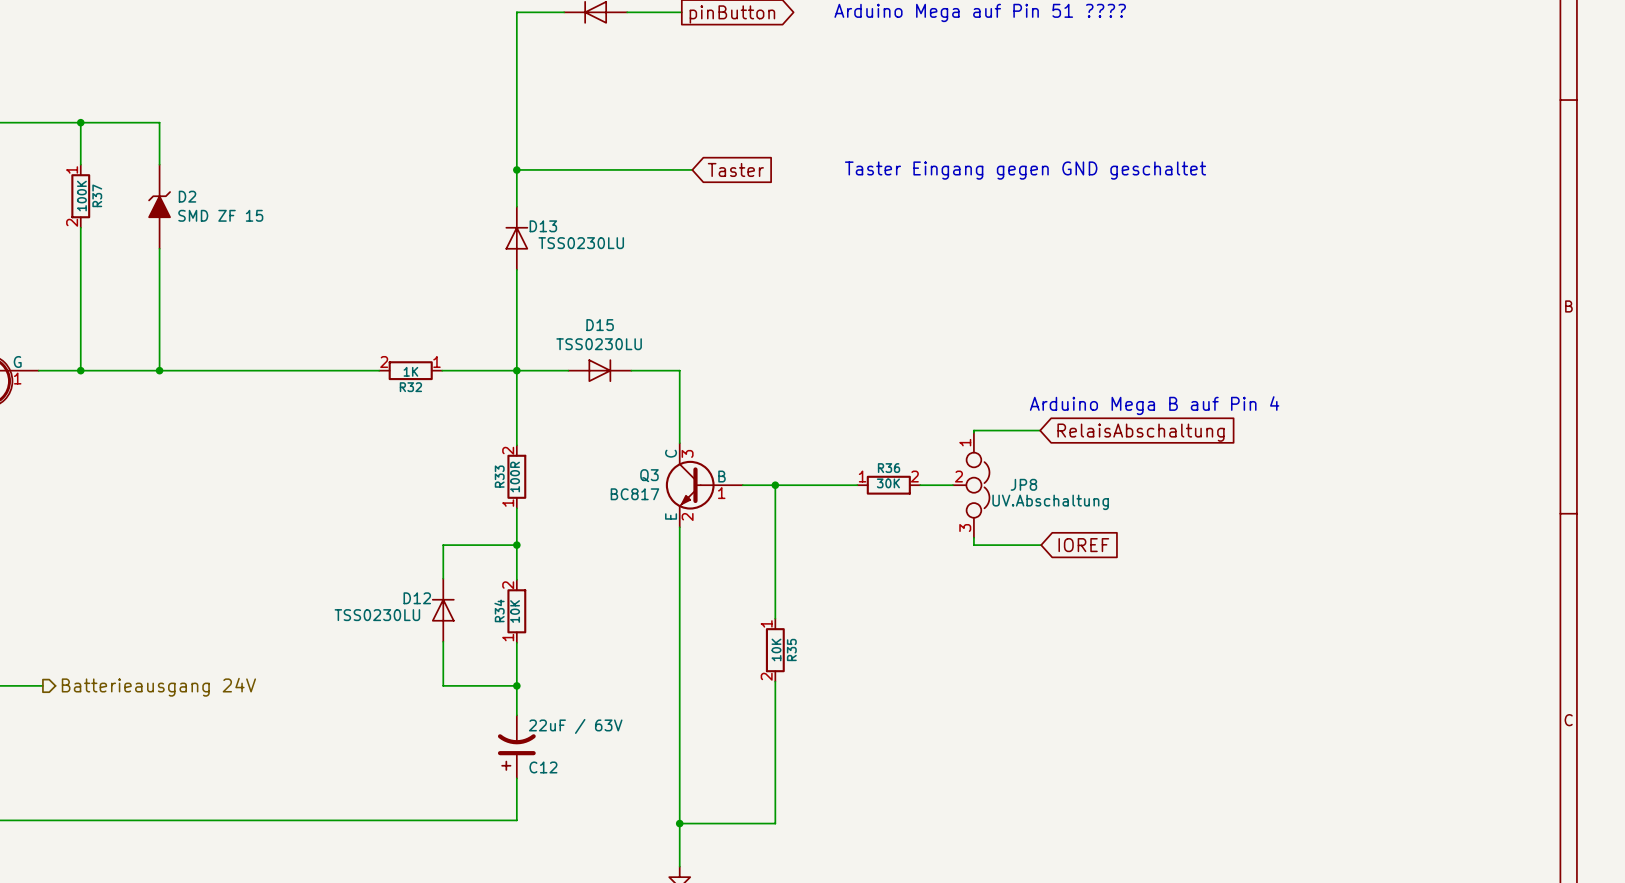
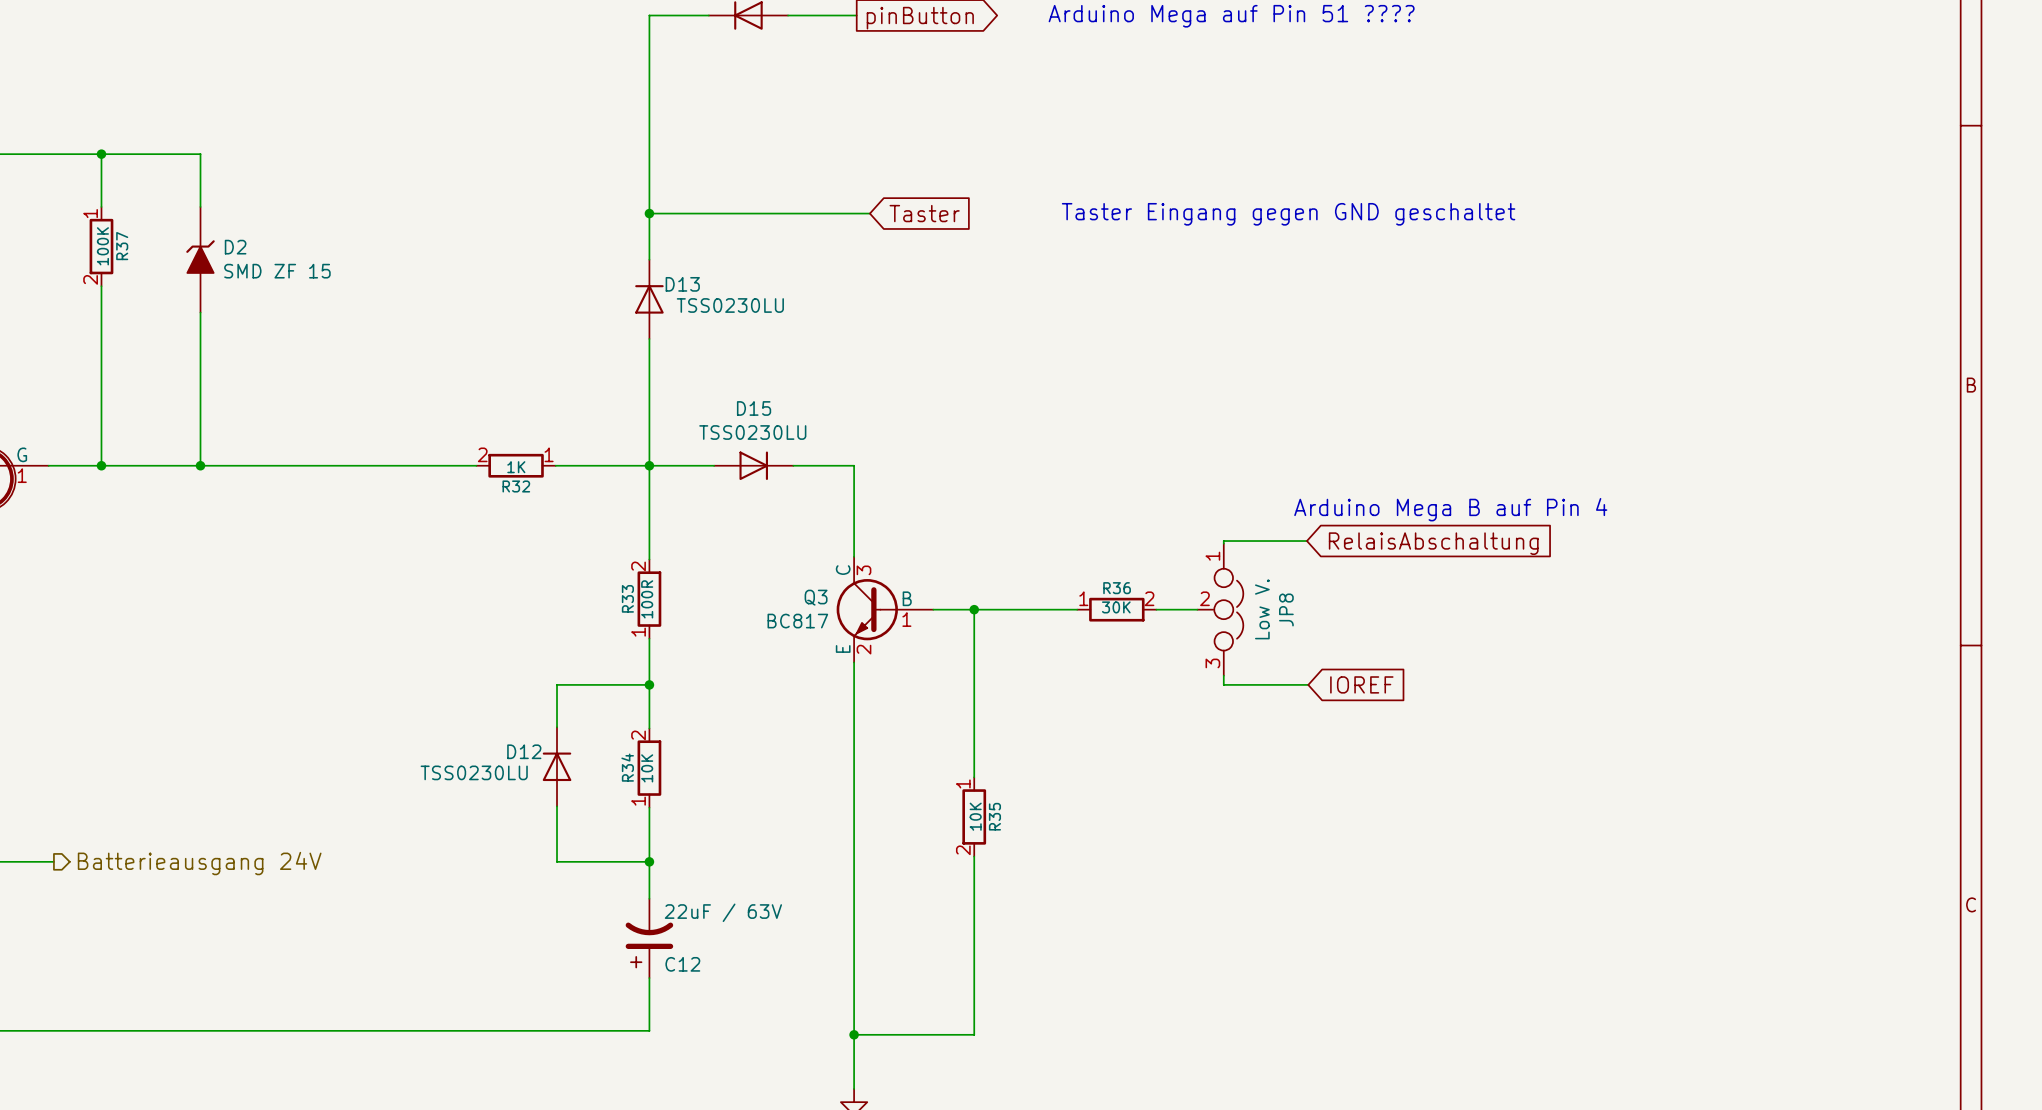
JP8 name rotation: 0° (1023, 484) -> 90° counterclockwise (1286, 609)
JP8 value: UV.Abschaltung (1050, 502) -> Low V. (1262, 609)

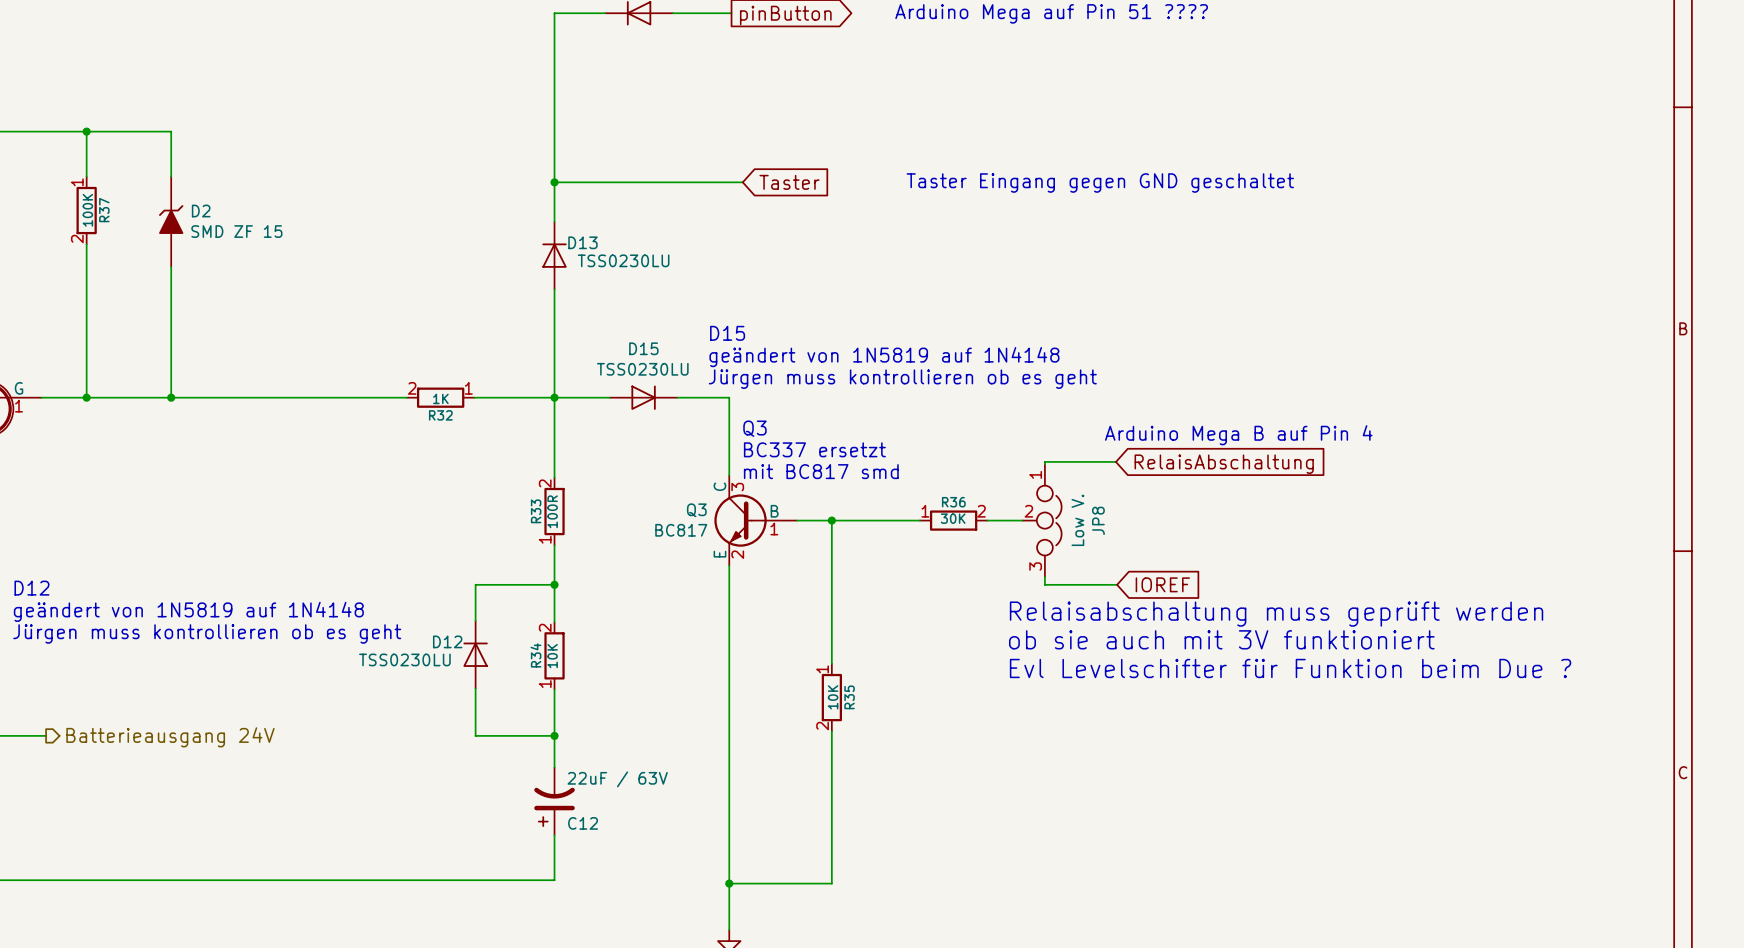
text: none -> D15 (727, 333)
text: none -> geändert von 1N5819 auf 1N4148 (884, 357)
text: none -> Jürgen muss kontrollieren ob es geht (902, 379)
text: none -> Q3 (754, 428)
text: none -> BC337 ersetzt (814, 449)
text: none -> mit BC817 smd (821, 471)
text: none -> D12 (31, 588)
text: none -> geändert von 1N5819 auf 1N4148 (188, 611)
text: none -> Relaisabschaltung muss geprüft werden (1276, 614)
text: none -> Jürgen muss kontrollieren ob es geht (207, 633)
text: none -> ob sie auch mit 3V funktioniert (1221, 639)
text: none -> Evl Levelschifter für Funktion beim Due ? (1290, 668)

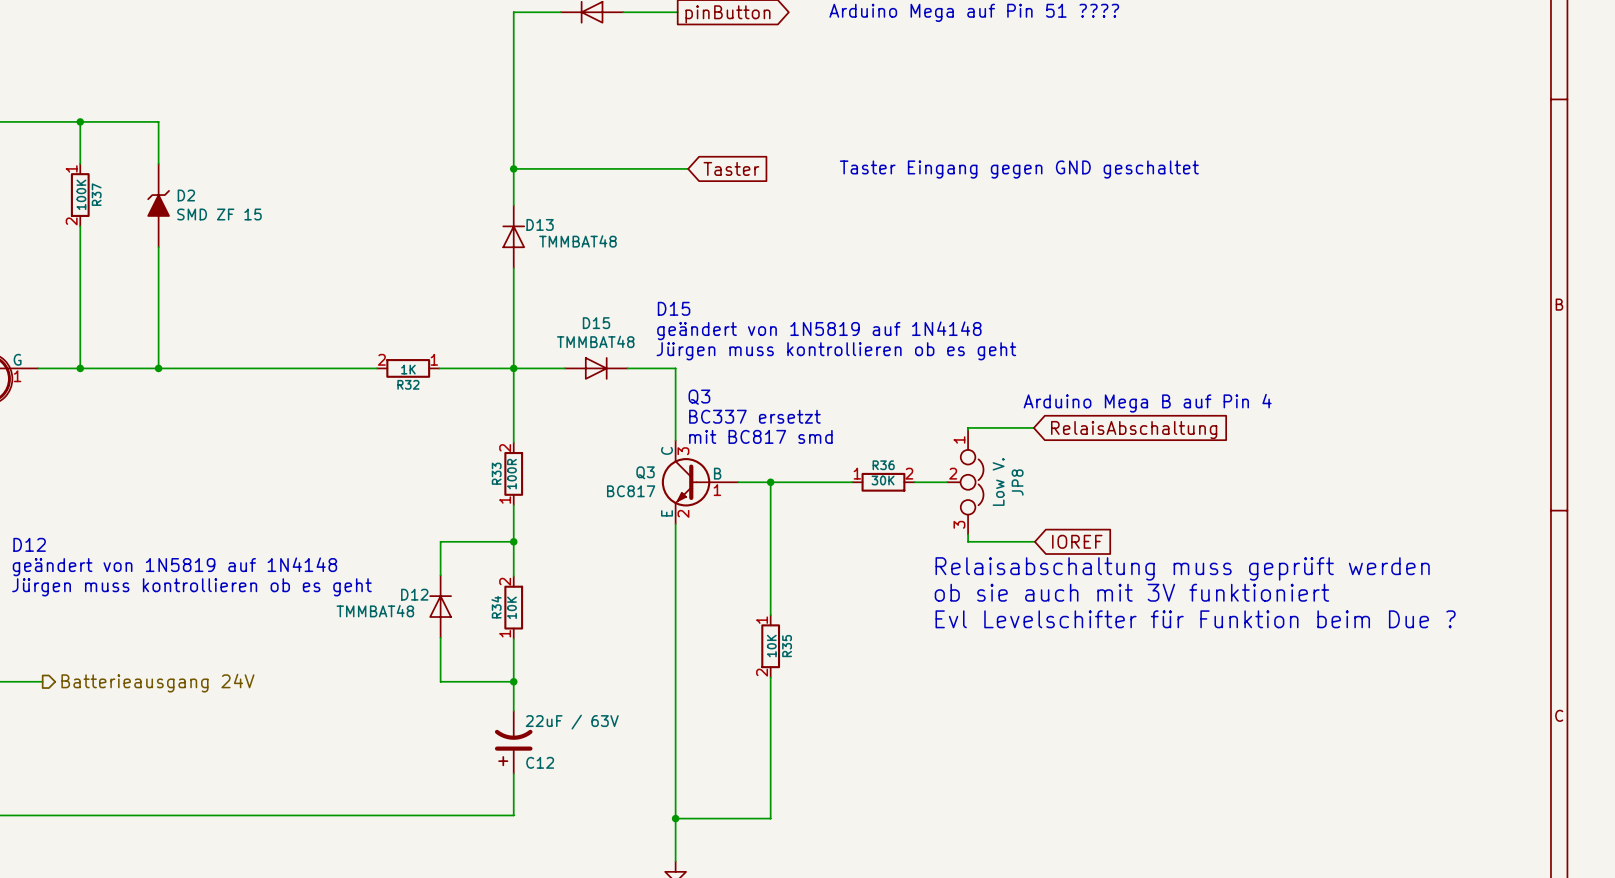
D13 value: TSS0230LU (623, 260) -> TMMBAT48 (577, 241)
D15 value: TSS0230LU (642, 369) -> TMMBAT48 (595, 341)
D12 value: TSS0230LU (404, 659) -> TMMBAT48 (375, 611)

